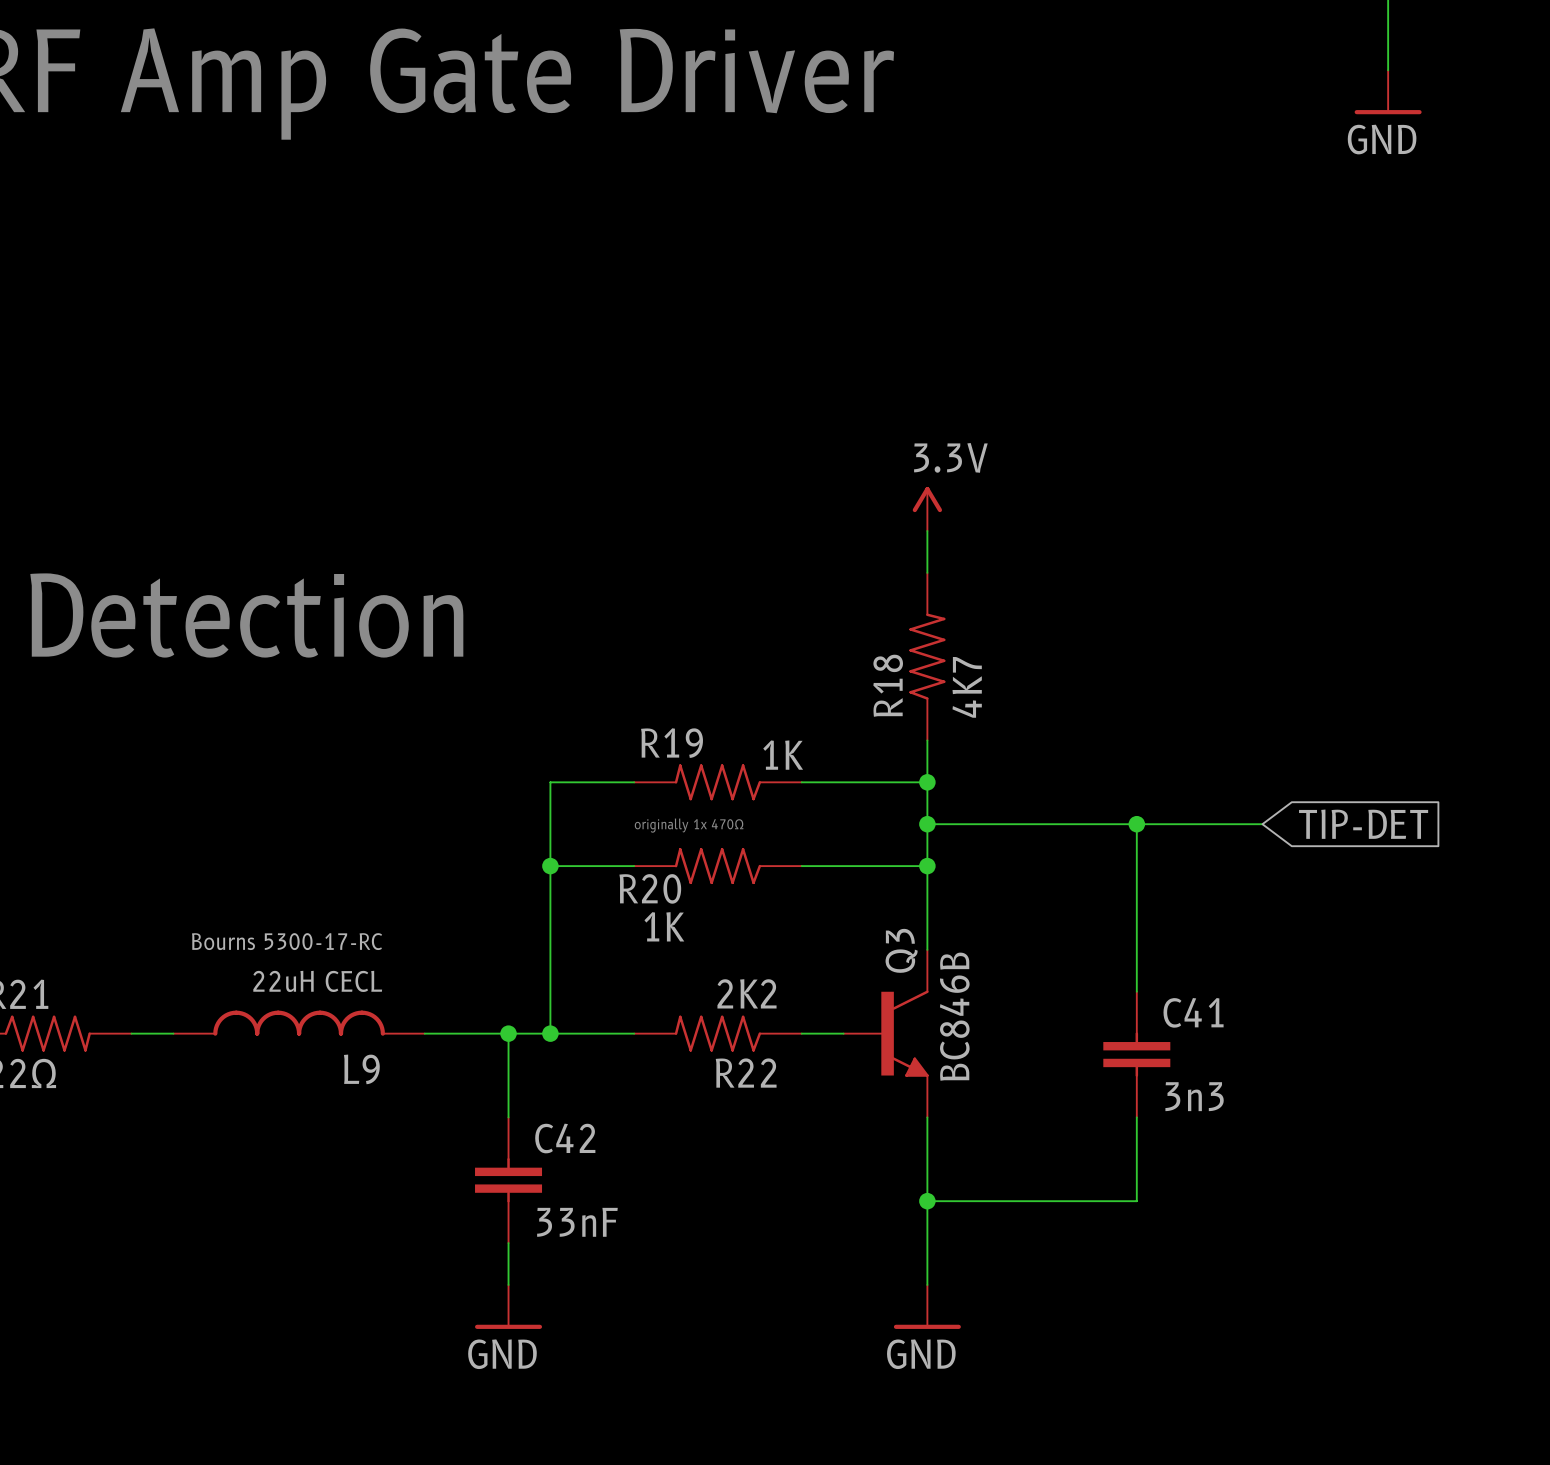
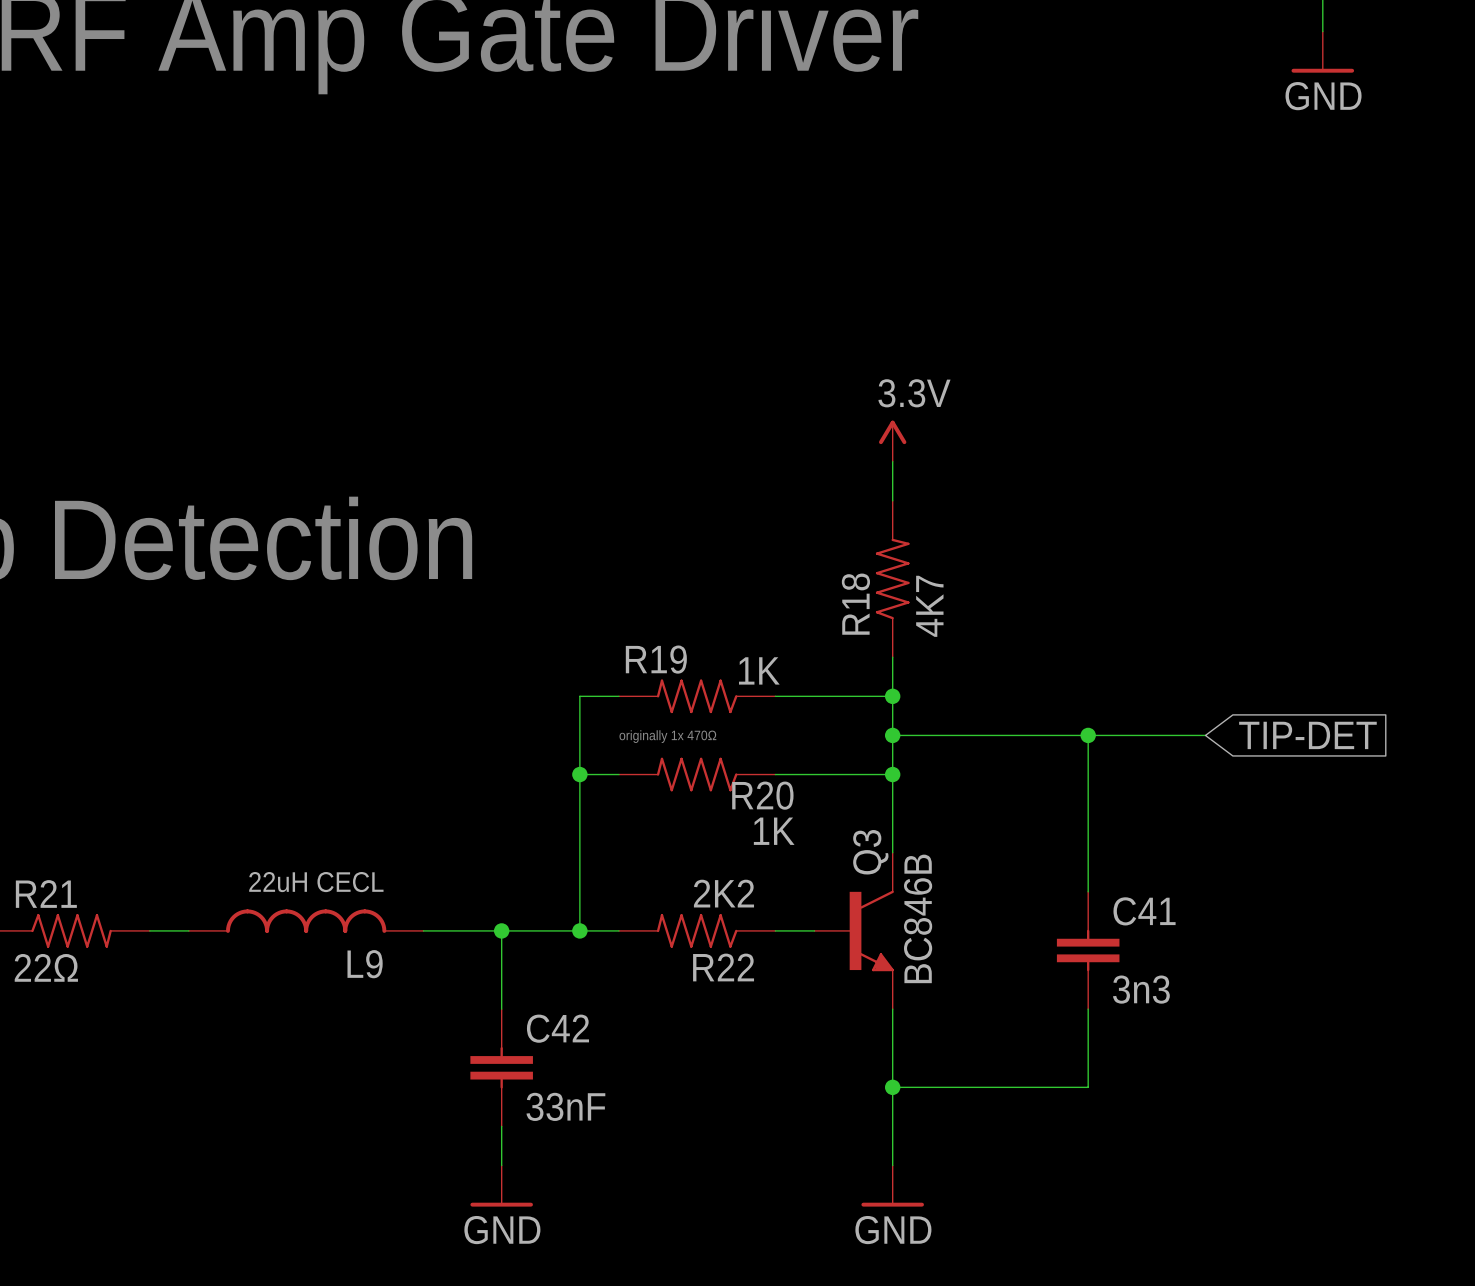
wire: (592, 782) (550, 782) (550, 1033) -> (579, 696) (579, 930)
wire: (550, 866) (592, 866) -> none
junction position: (550, 866) -> (579, 774)
R20 name position: R20 (650, 888) -> R20 (762, 795)
R20 value position: 1K (664, 926) -> 1K (774, 831)
text: Bourns 5300-17-RC (287, 941) -> none
junction position: (550, 1033) -> (579, 930)

